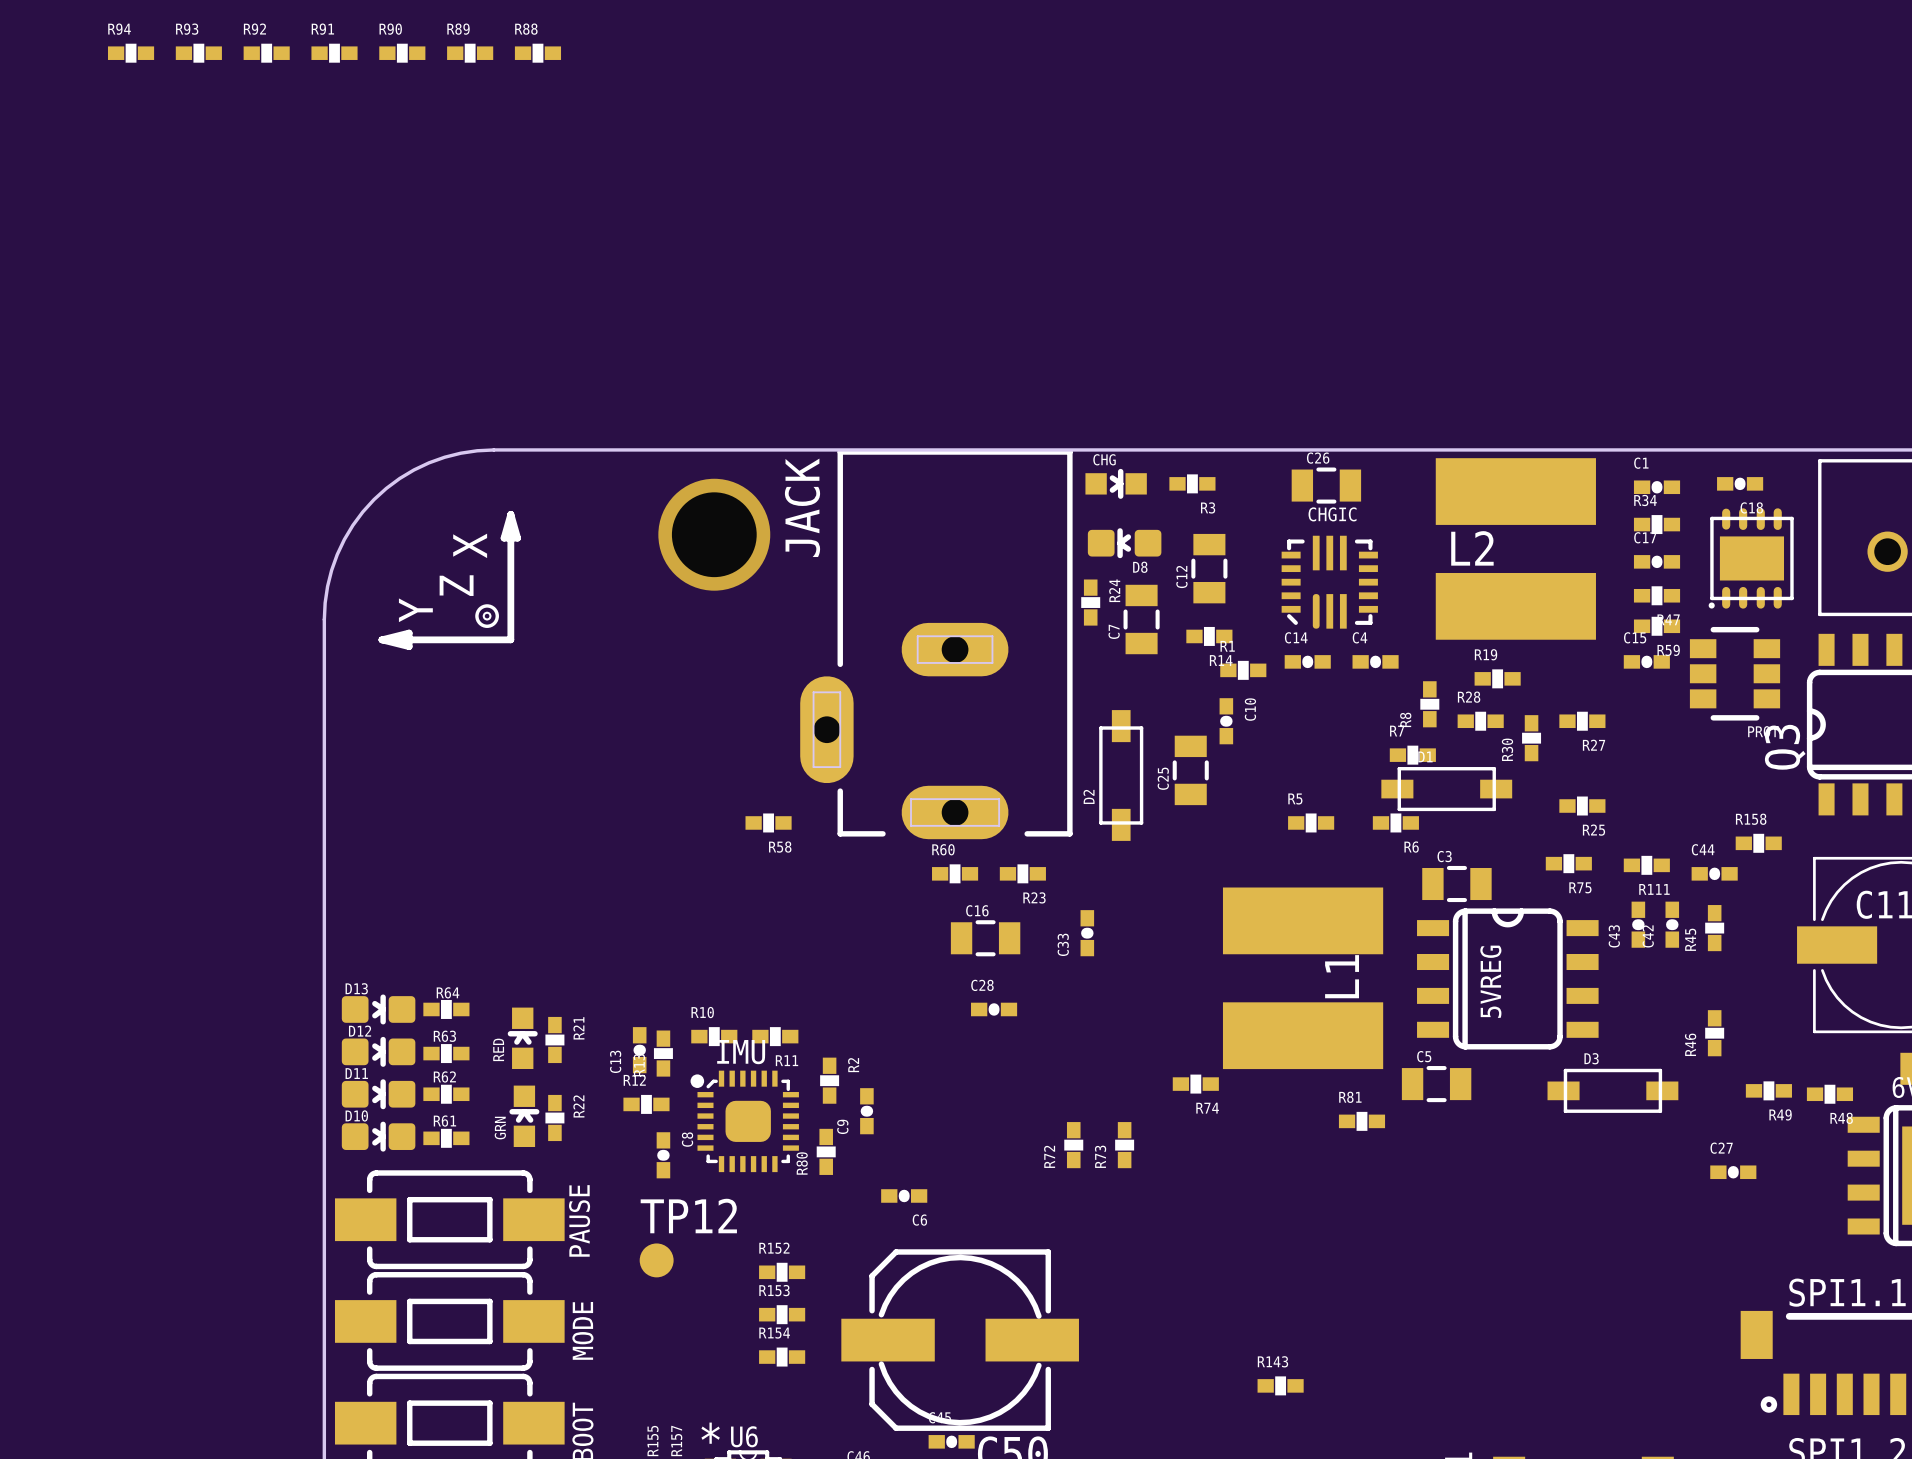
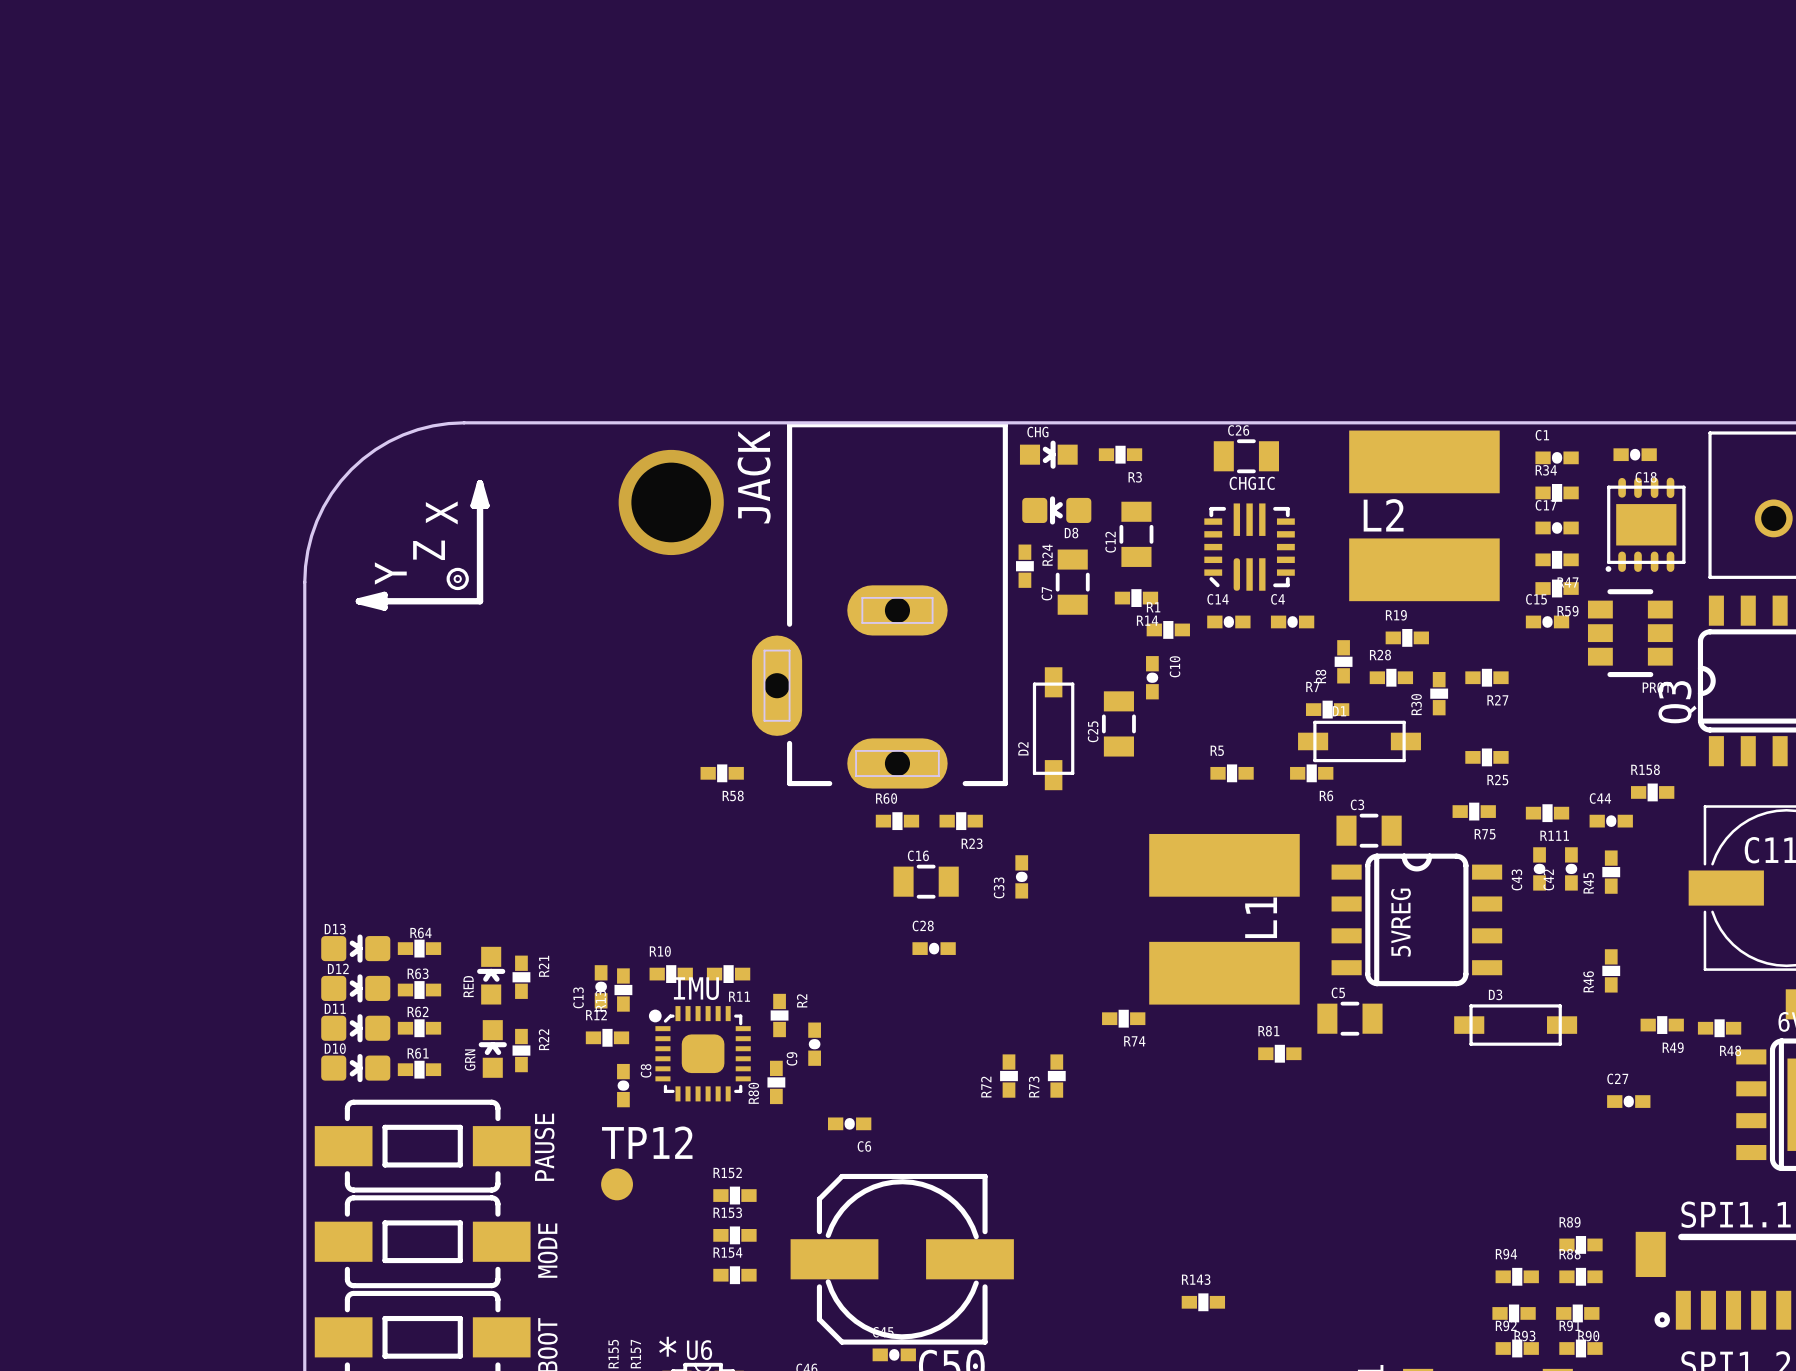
R93 name position: R93 (187, 29) -> R93 (1524, 1336)
R90 name position: R90 (390, 29) -> R90 (1588, 1336)
R94 position: (131, 53) -> (1517, 1276)
R93 position: (198, 53) -> (1514, 1313)
R92 position: (266, 53) -> (1517, 1348)
R91 position: (334, 53) -> (1580, 1348)
R90 position: (402, 53) -> (1577, 1313)
R89 position: (470, 53) -> (1580, 1244)
R88 position: (537, 53) -> (1580, 1276)

